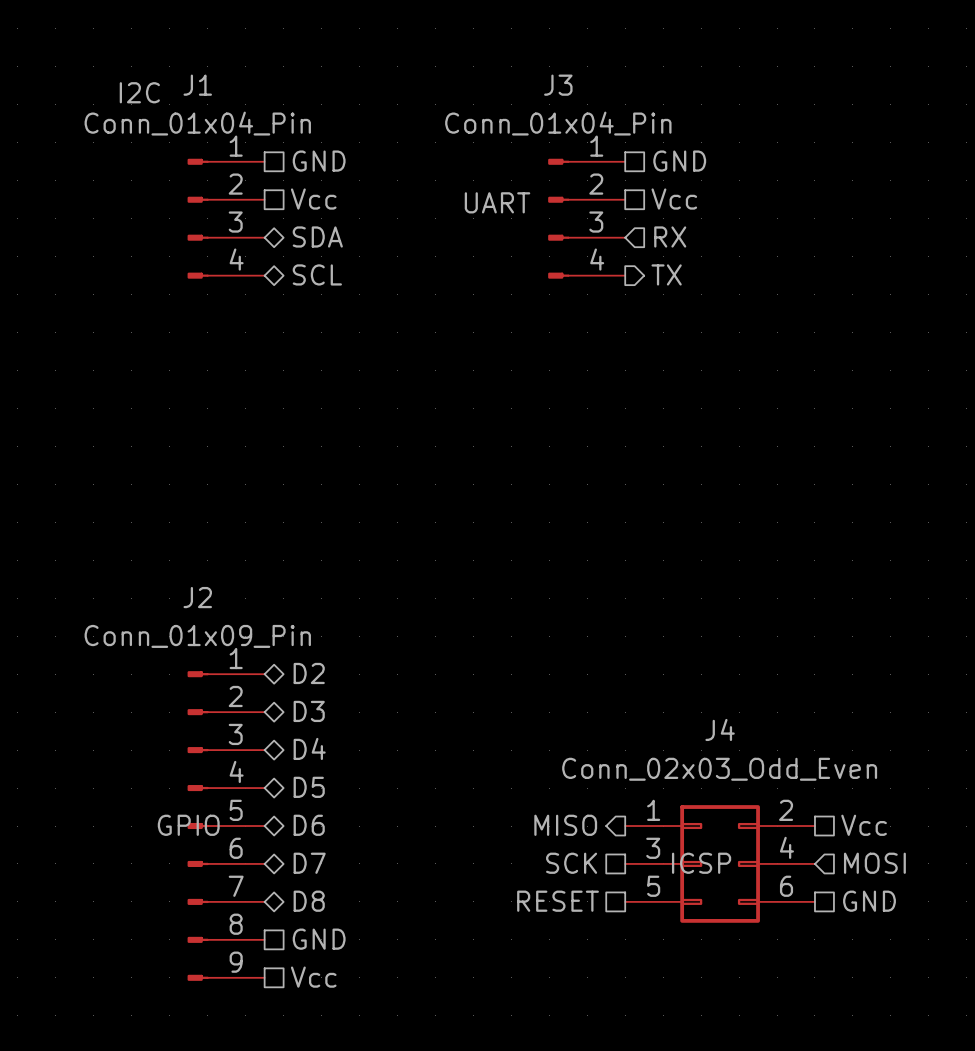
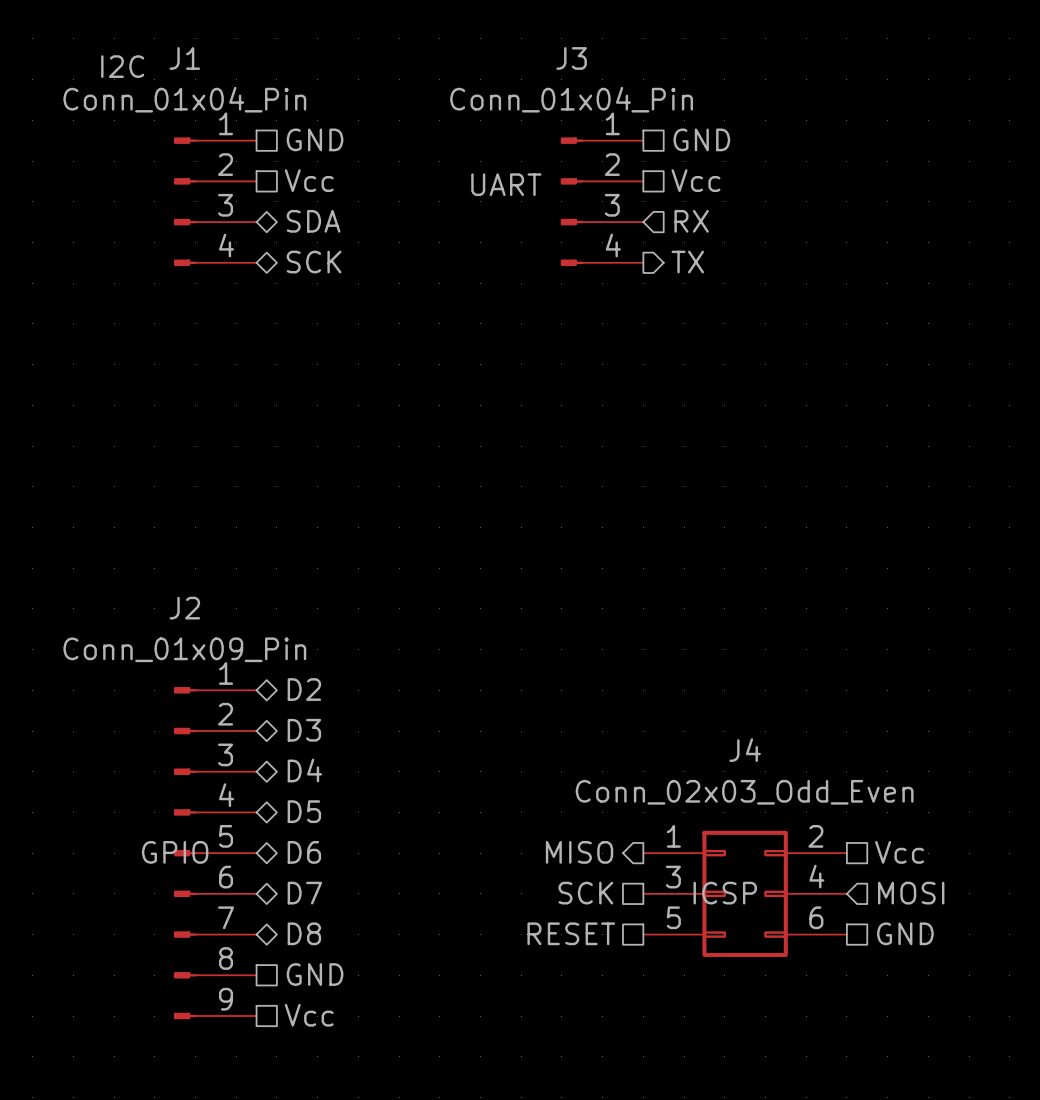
hierarchical label: SCL (317, 274) -> SCK (314, 262)

